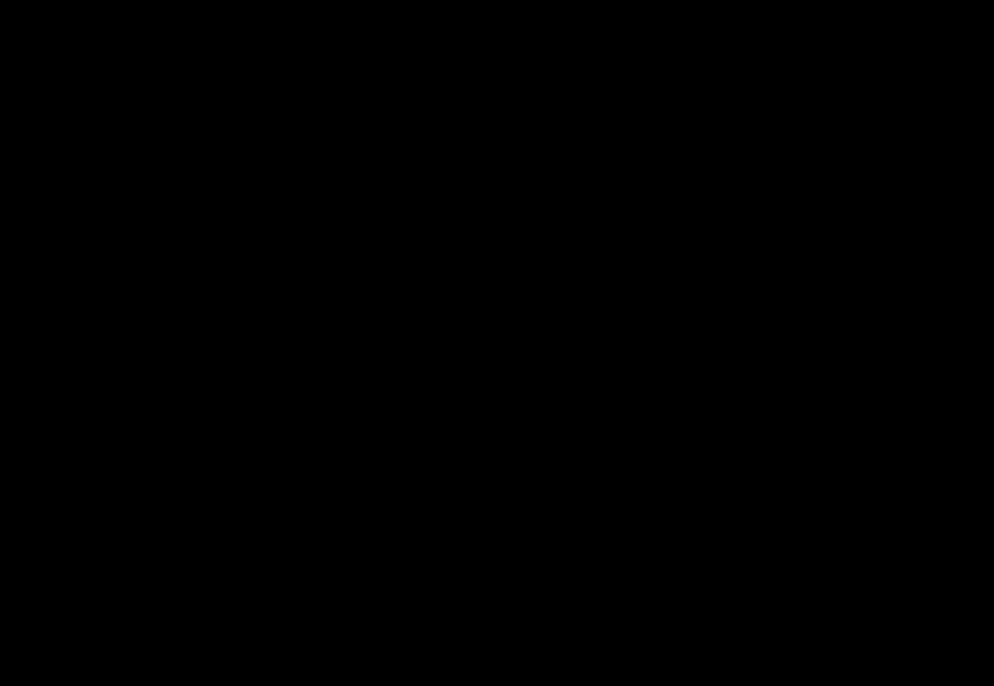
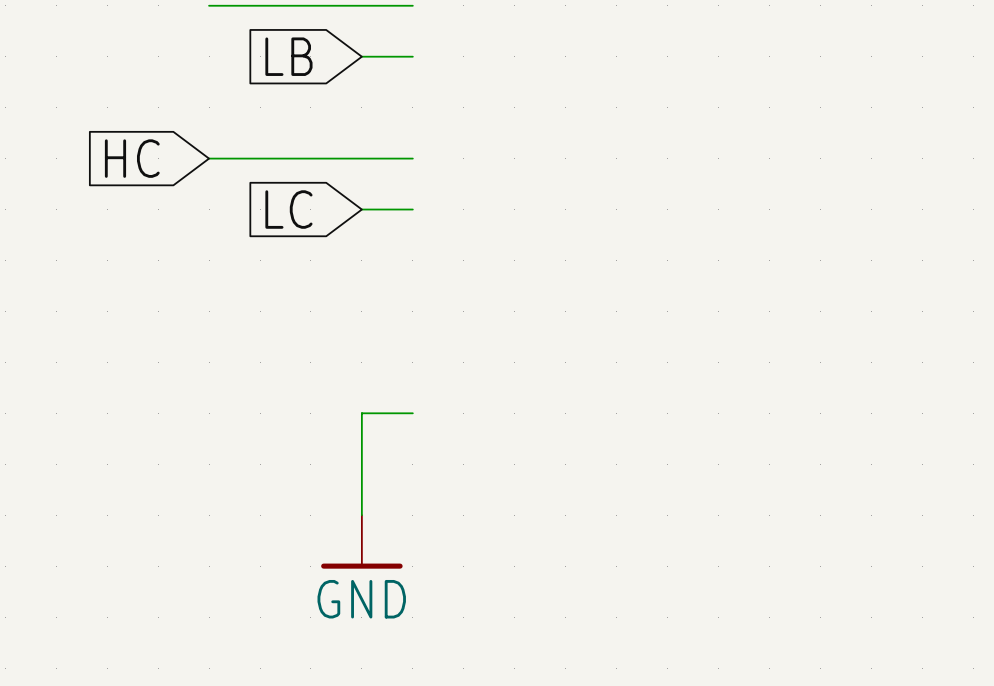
wire: none -> (209, 5) (412, 5)
global label: none -> LB (288, 56)
wire: none -> (361, 56) (412, 56)
global label: none -> HC (132, 158)
wire: none -> (209, 158) (412, 158)
global label: none -> LC (288, 209)
wire: none -> (361, 209) (412, 209)
wire: none -> (412, 413) (361, 413) (361, 515)
power symbol: none -> GND (361, 541)

